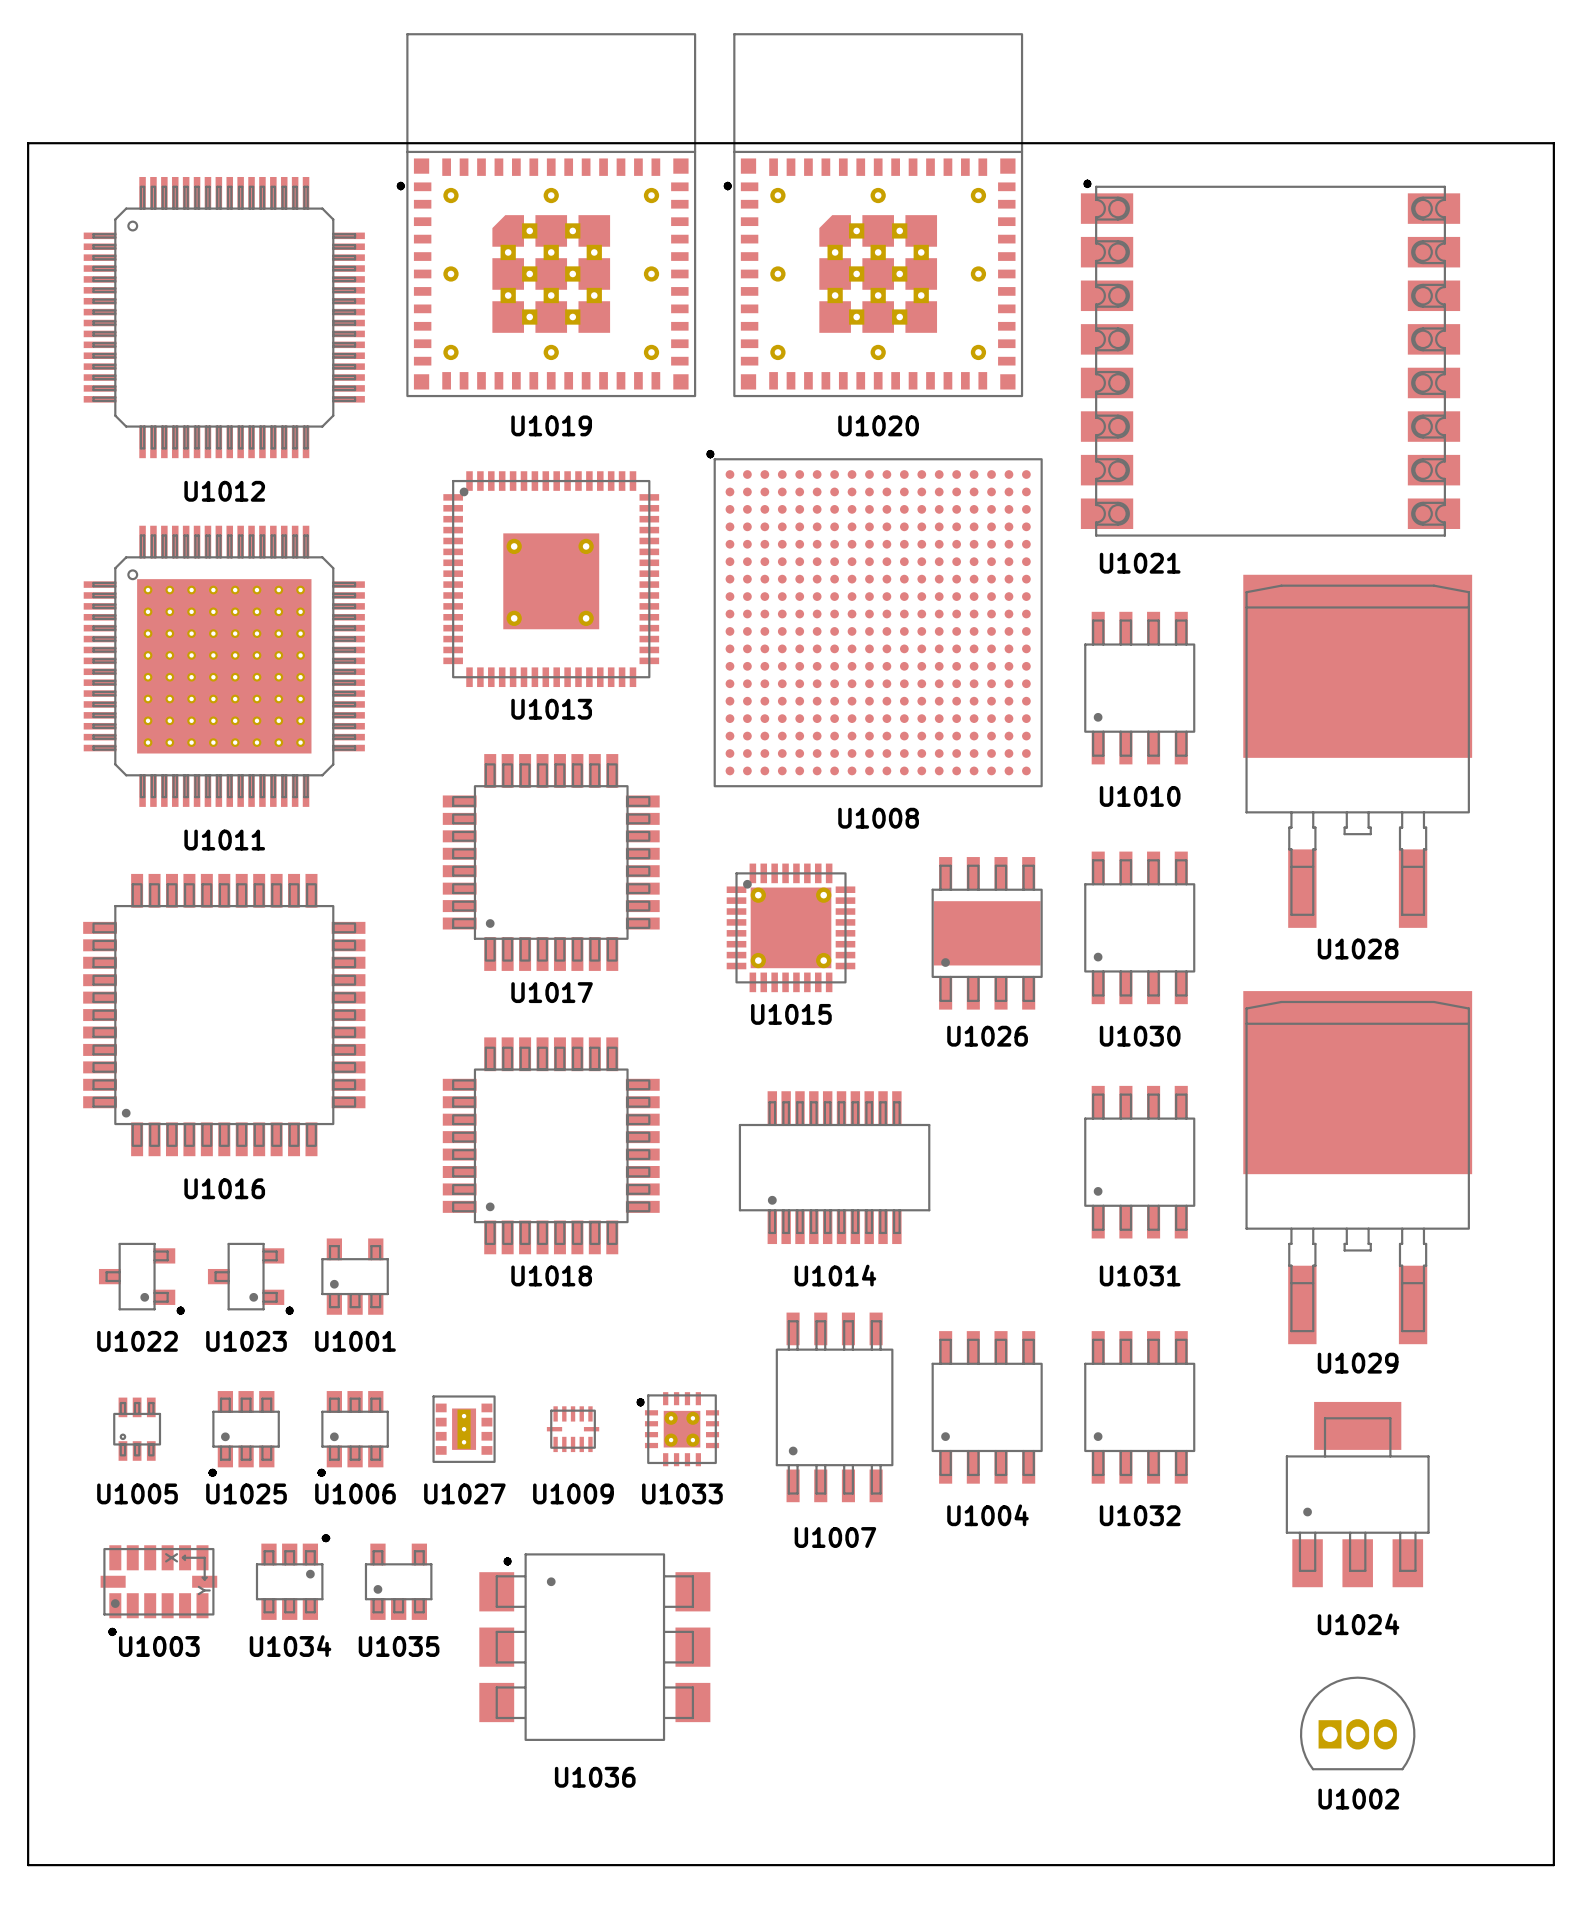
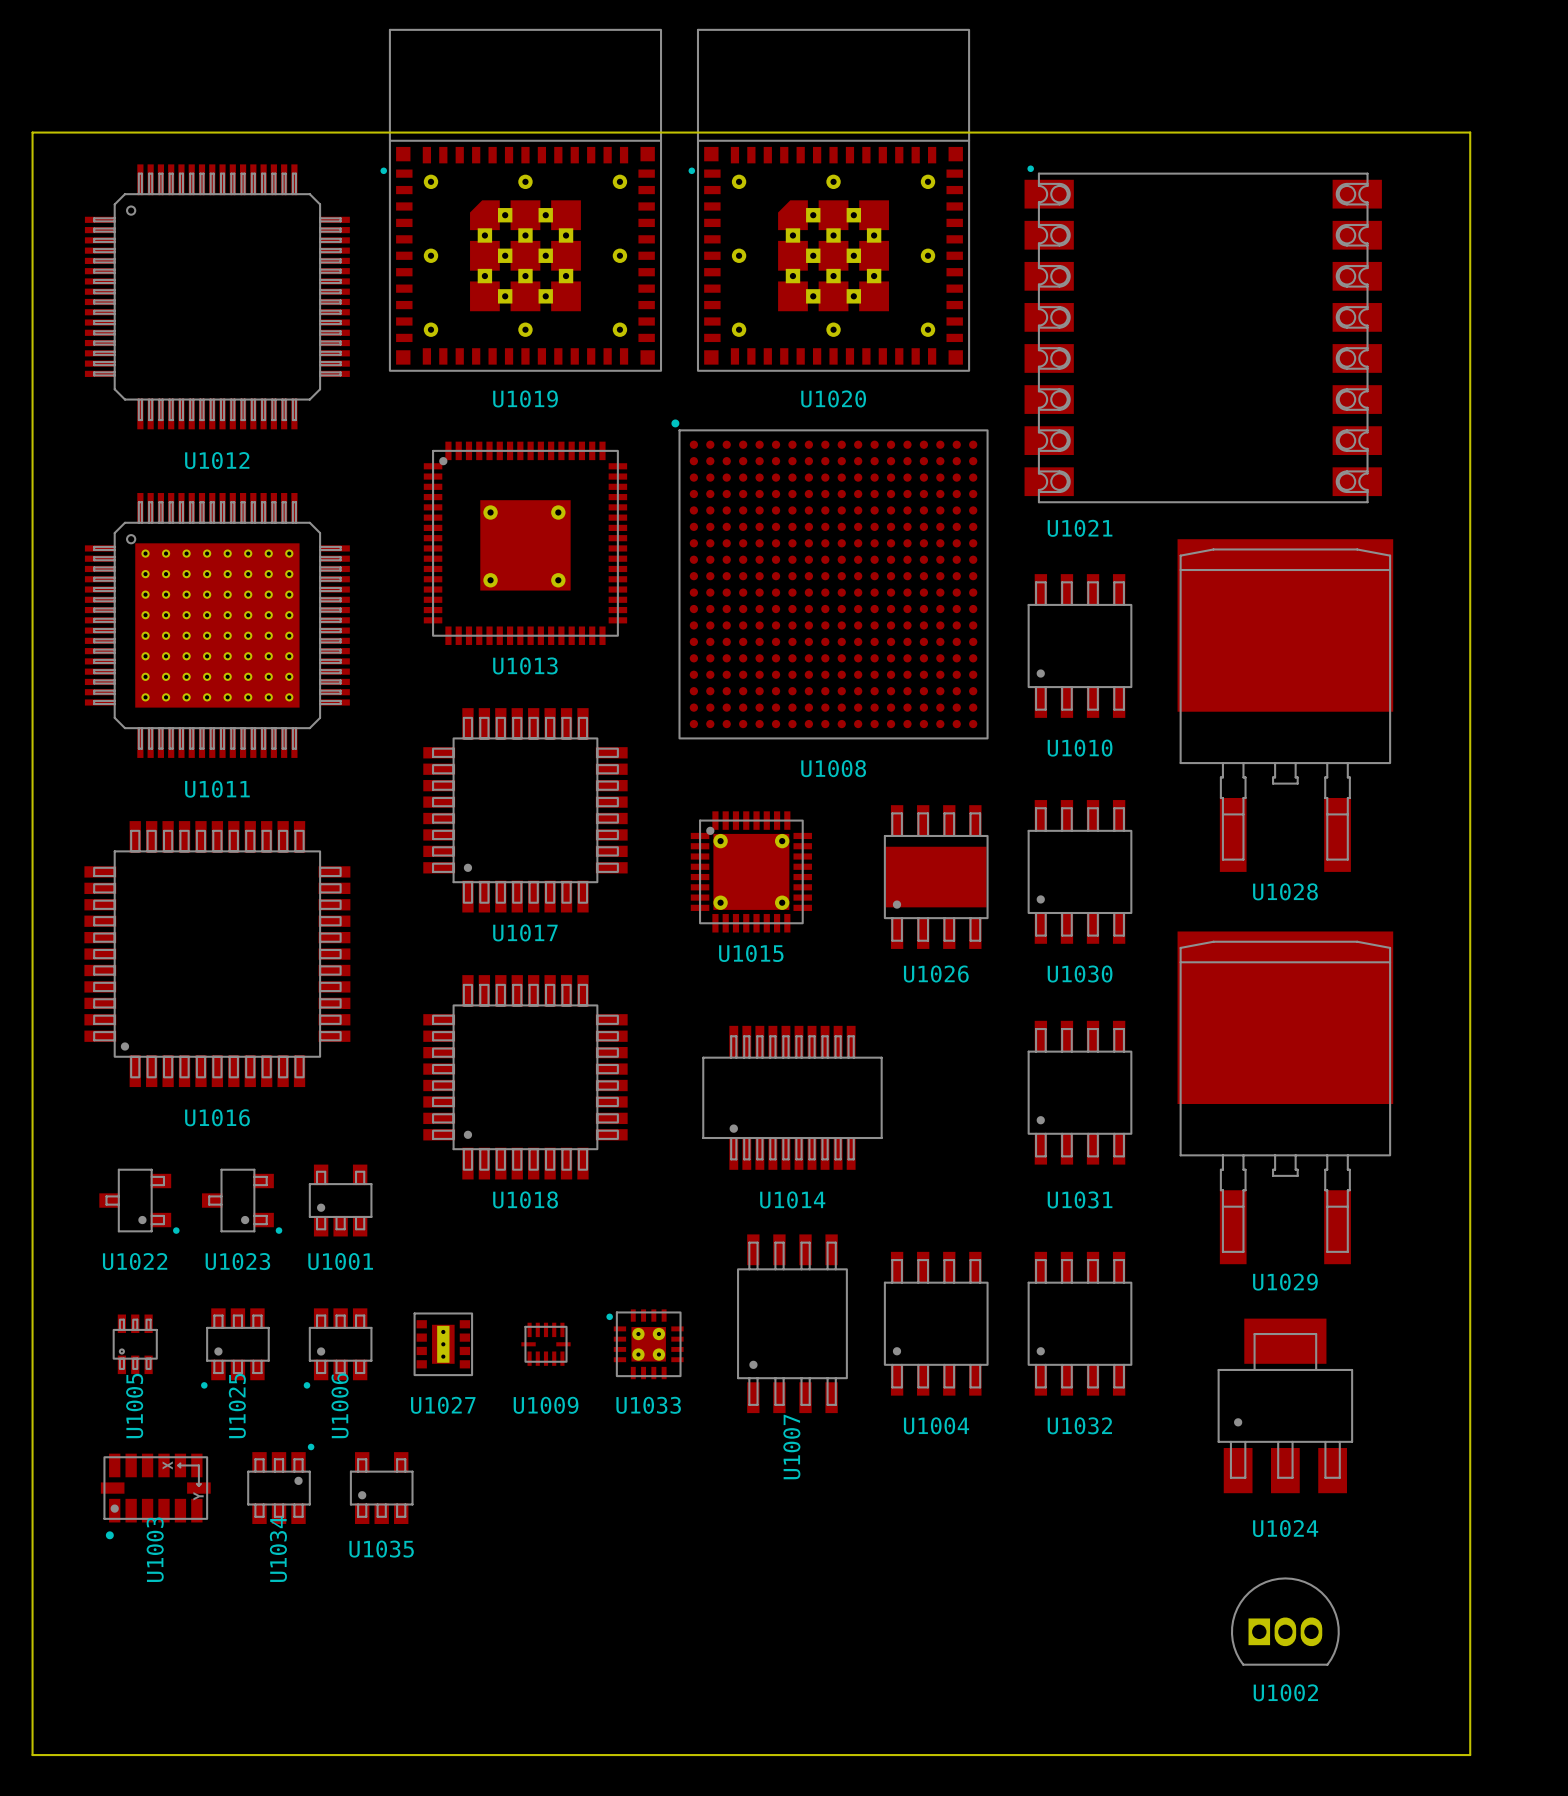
U1005 name rotation: 0° (137, 1493) -> 90° counterclockwise (134, 1406)
U1025 name rotation: 0° (246, 1493) -> 90° counterclockwise (237, 1406)
U1006 name rotation: 0° (355, 1493) -> 90° counterclockwise (340, 1405)
U1007 name rotation: 0° (835, 1537) -> 90° counterclockwise (791, 1447)
U1003 name rotation: 0° (159, 1646) -> 90° counterclockwise (155, 1549)
U1034 name rotation: 0° (290, 1646) -> 90° counterclockwise (278, 1549)
U1036: (594, 1647) -> none

